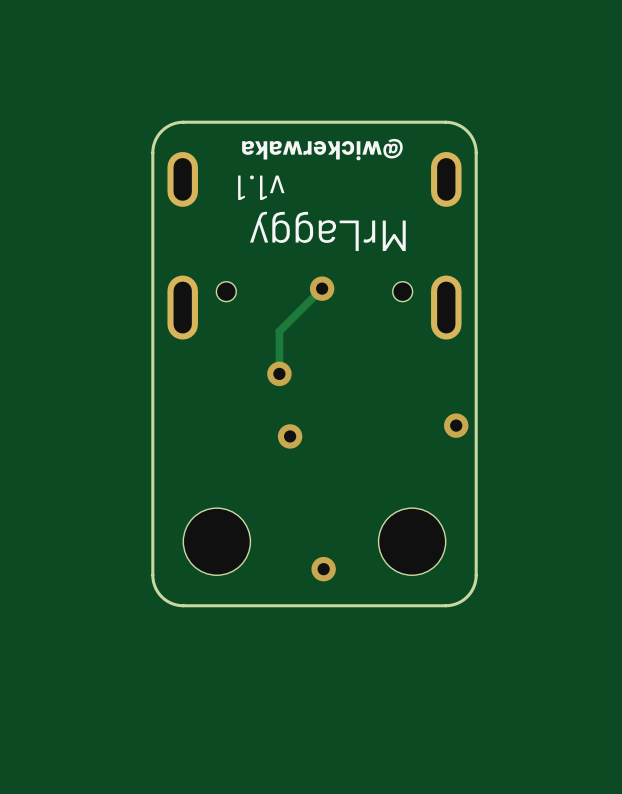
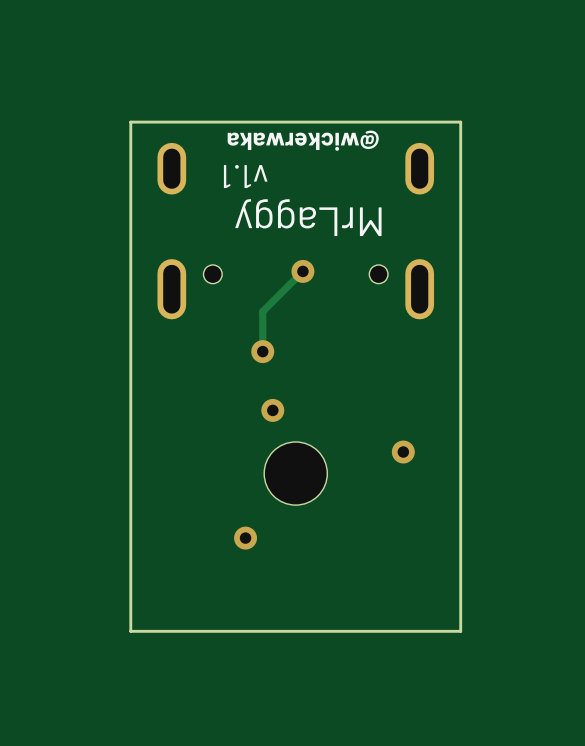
board edge: (445, 122) (183, 122) (170, 125) (157, 136) (152, 152) (152, 575) (157, 591) (167, 601) (183, 605) (445, 605) (458, 602) (471, 591) (476, 575) (476, 152) (474, 142) (467, 131) (455, 123) (445, 122) -> (460, 122) (460, 631) (130, 631) (130, 122) (460, 122)
via position: (456, 425) -> (403, 452)
part: none -> (295, 473)
part: (216, 541) -> none
part: (412, 541) -> none
via position: (323, 569) -> (245, 538)

